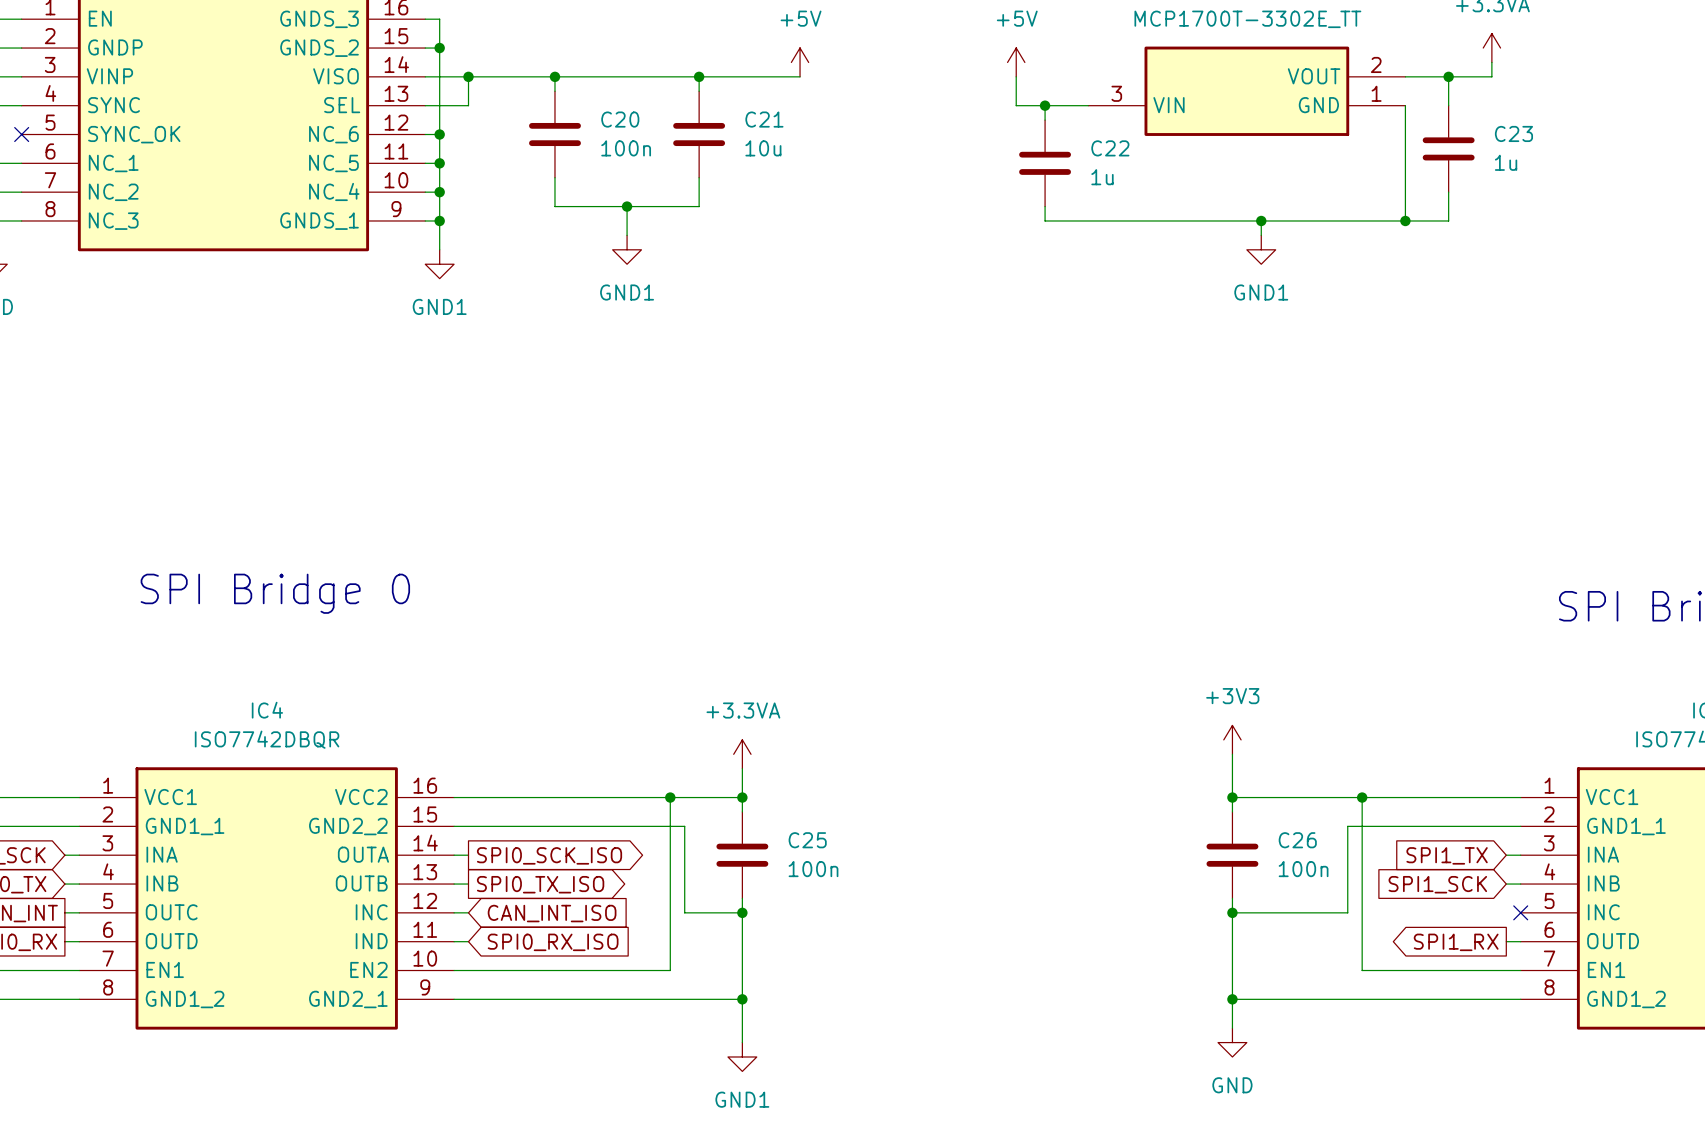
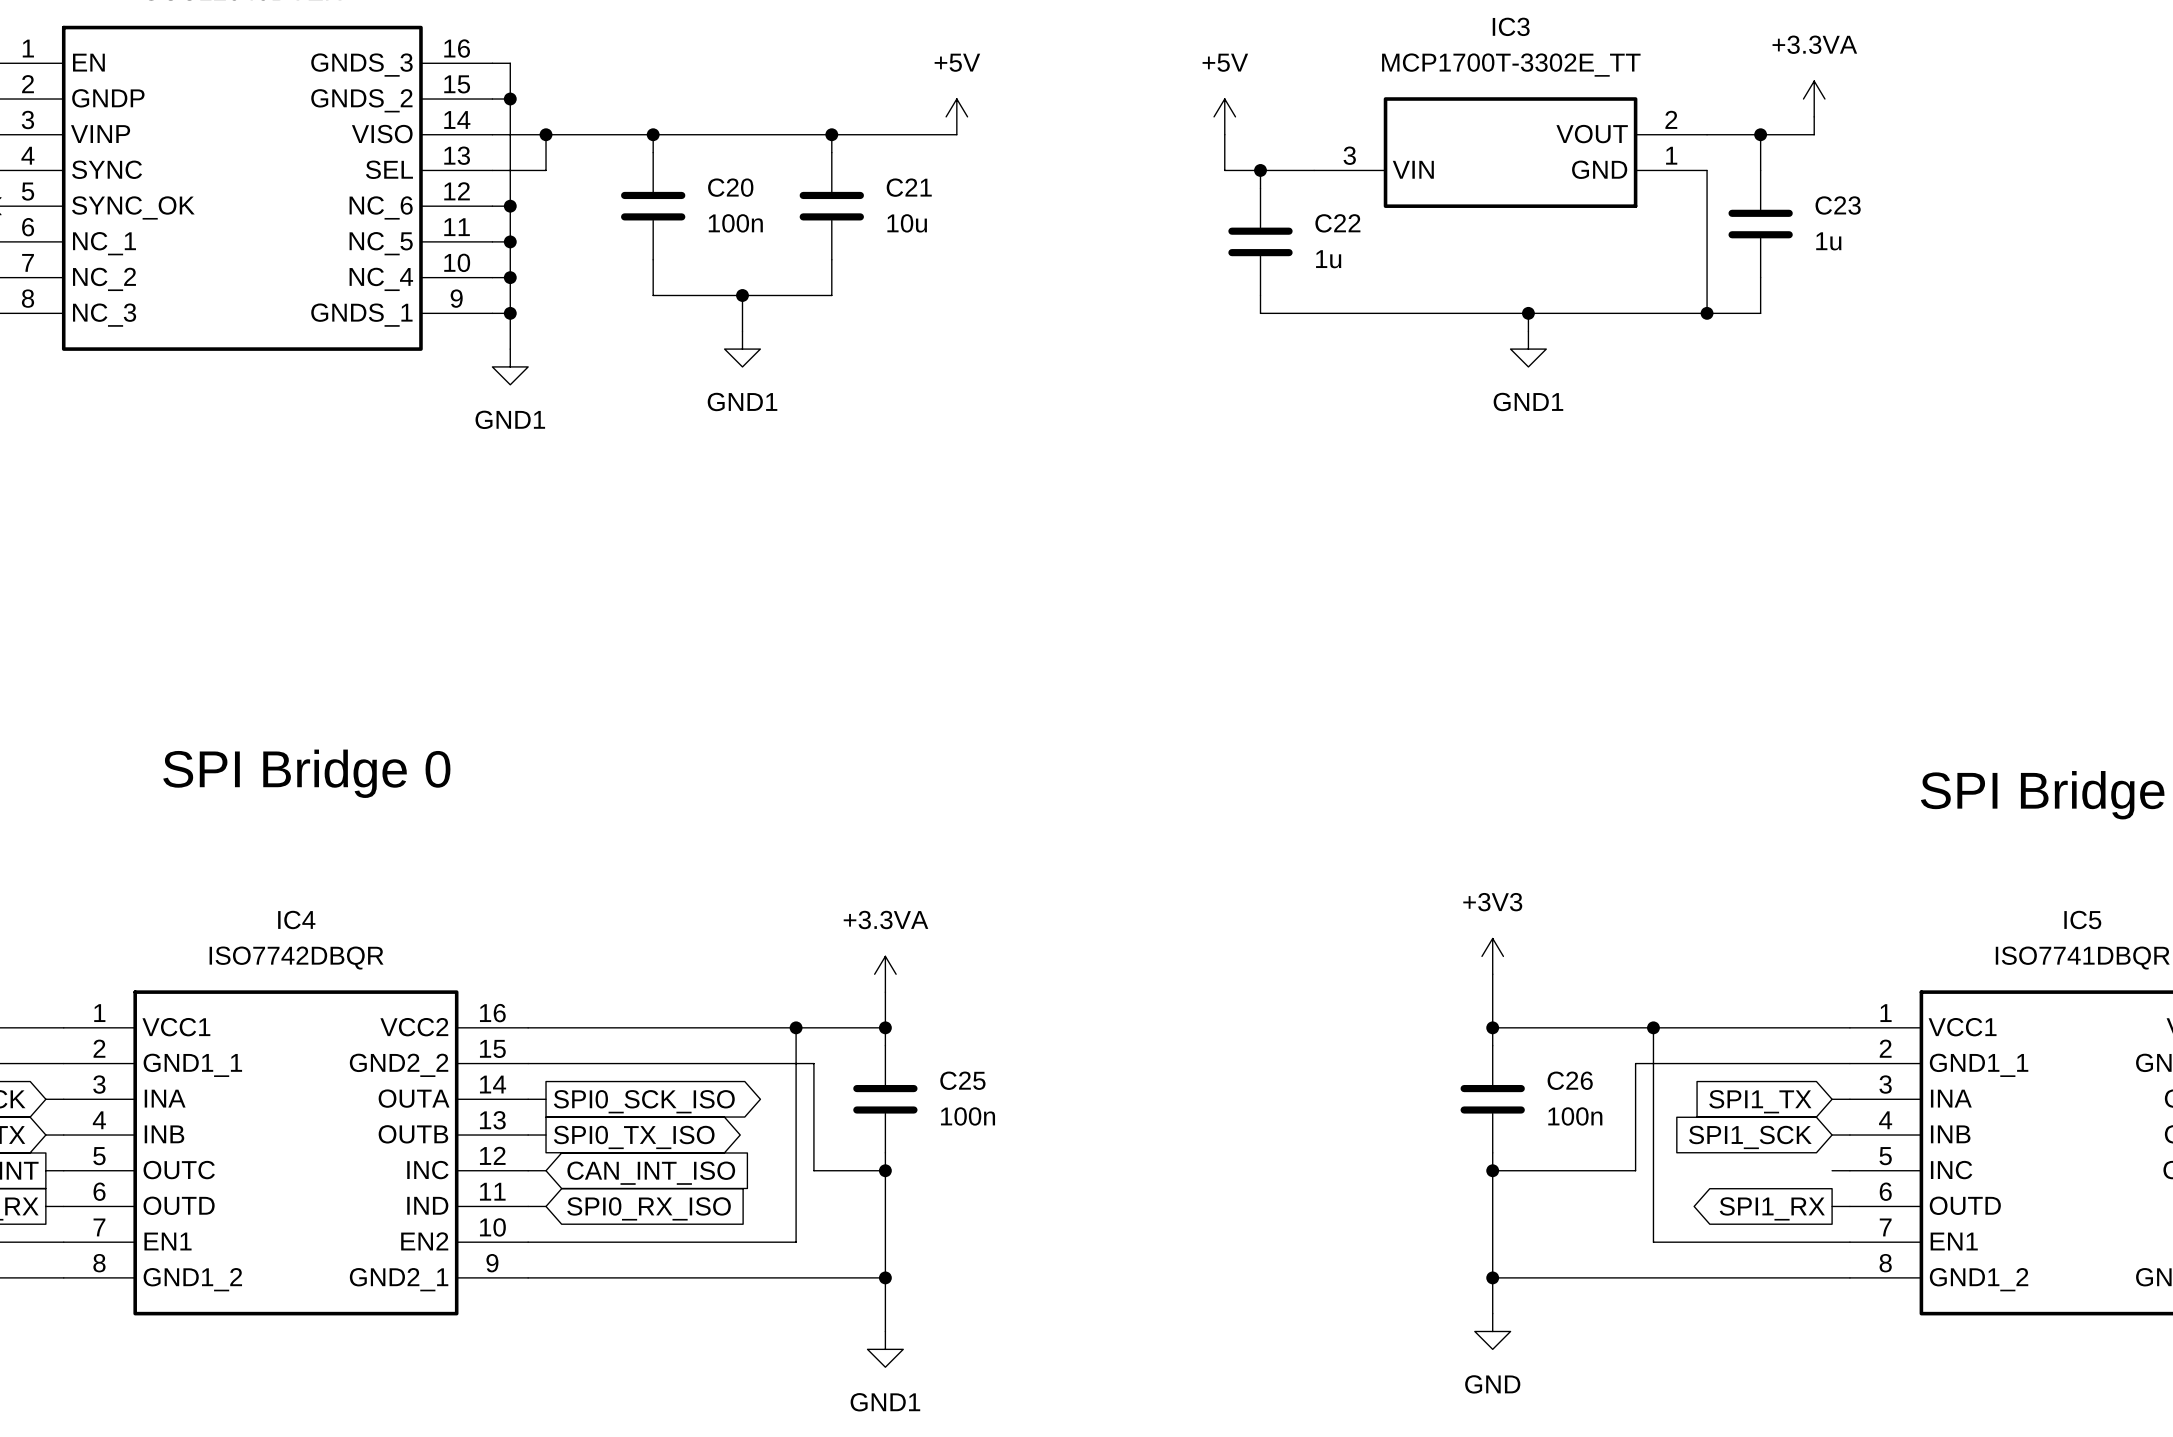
wire: none -> (1832, 1170) (1849, 1170)
no-connect mark: (1520, 912) -> none

